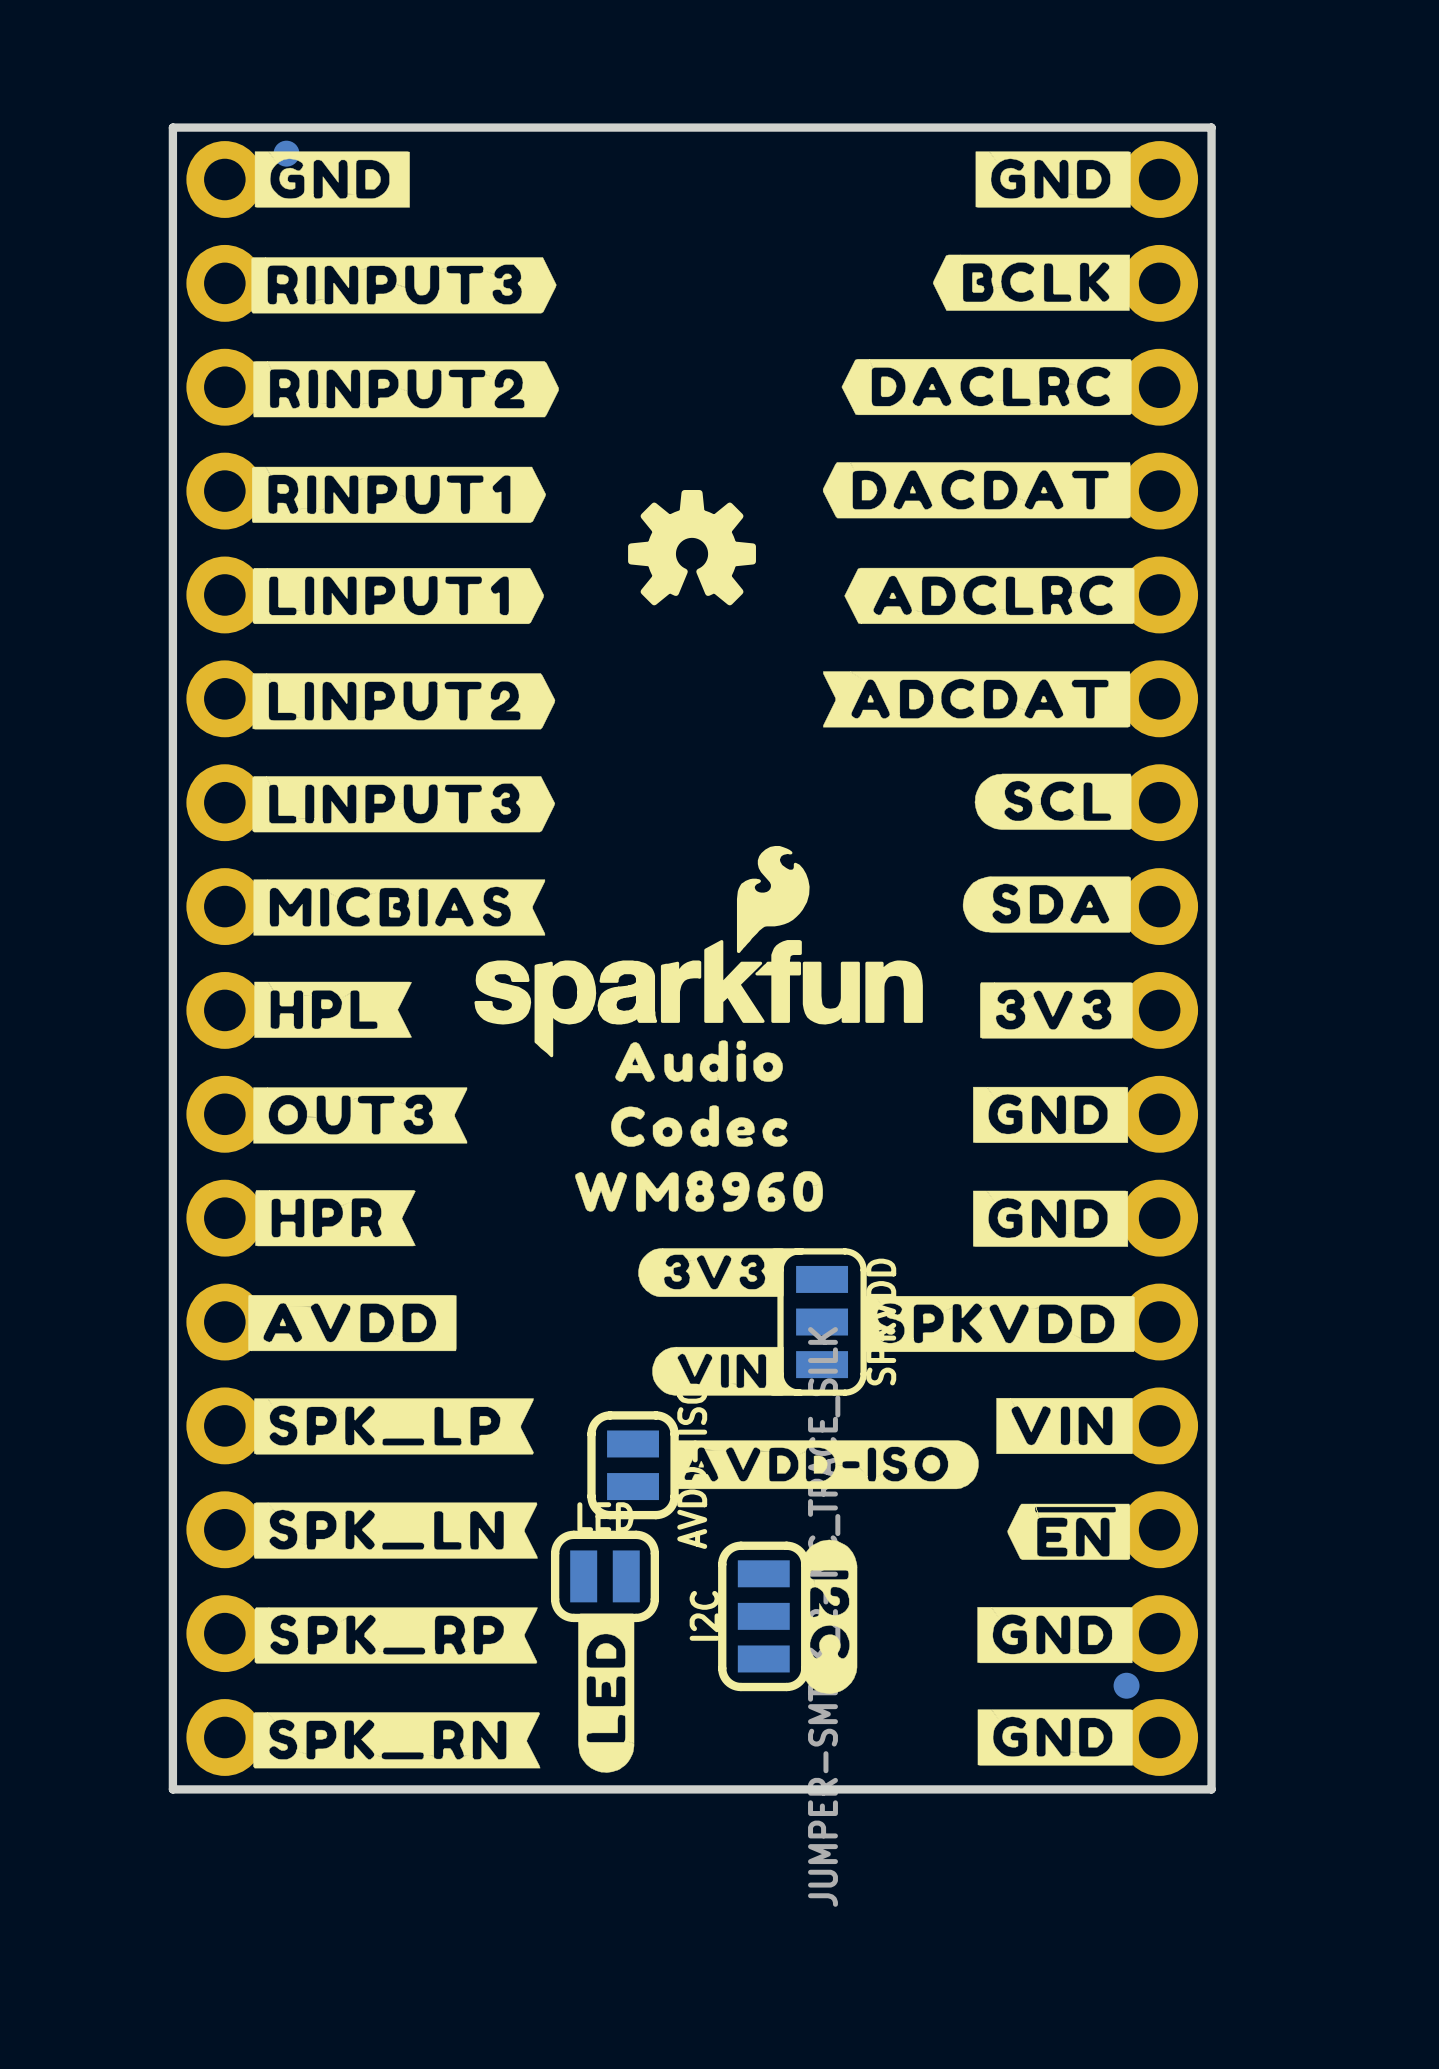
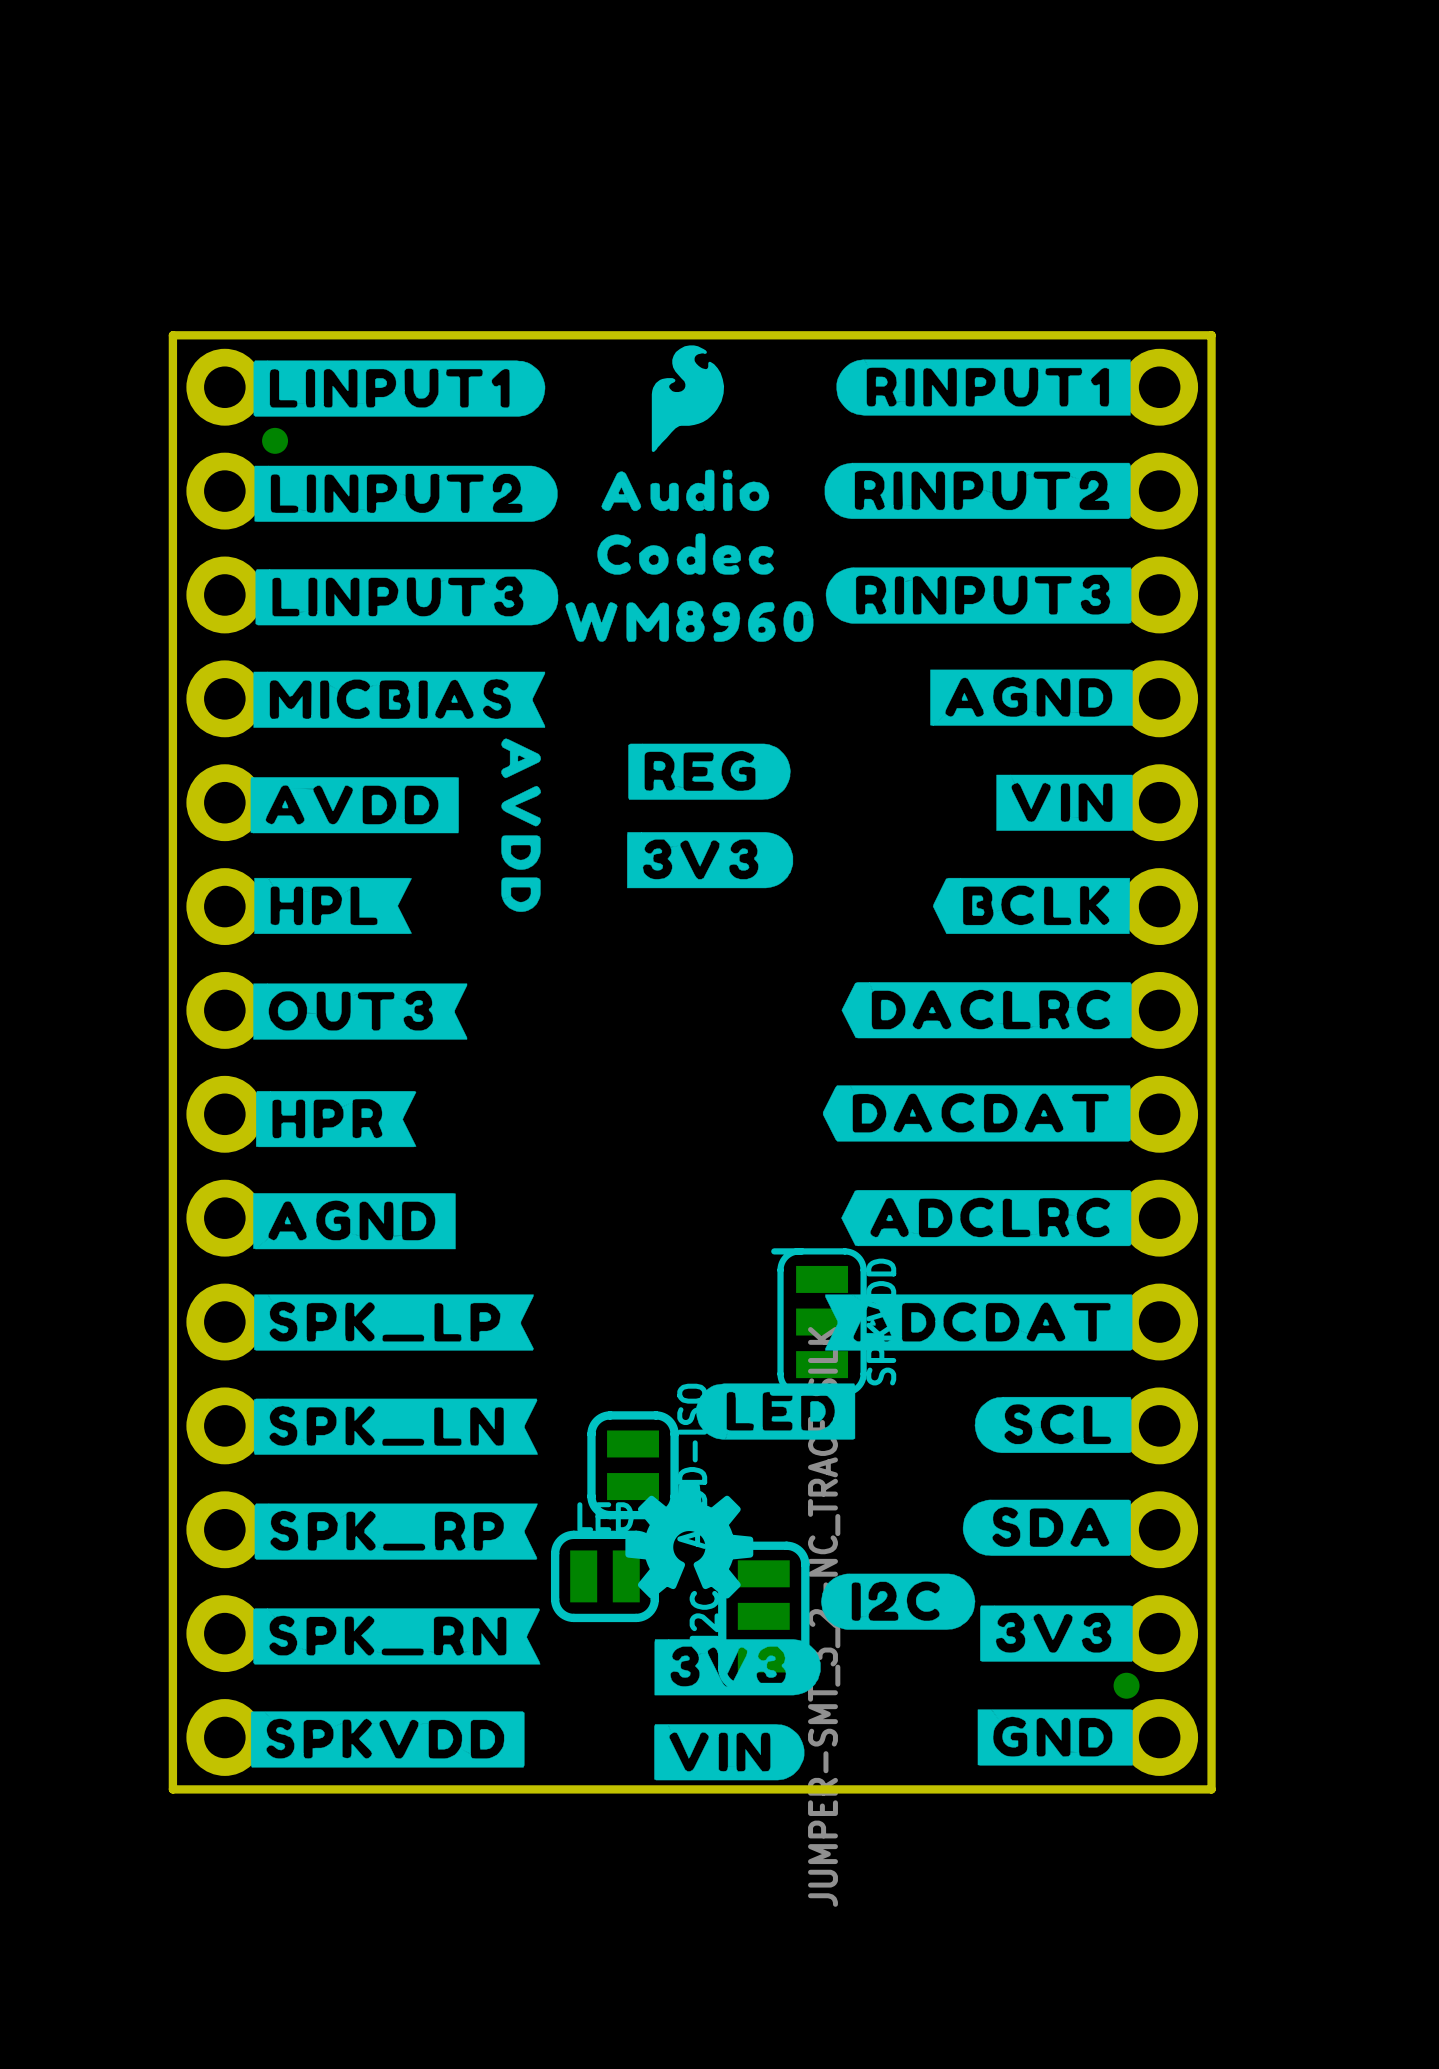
drawing: [254, 151, 410, 208] -> none
drawing: [975, 151, 1131, 208] -> none
part position: (286, 153) -> (275, 440)
drawing: [251, 257, 557, 314] -> none
drawing position: (1031, 282) -> (1031, 905)
board edge: (1211, 335) (1211, 127) (172, 127) (172, 335) -> (1211, 335) (172, 335)
drawing: none -> [651, 345, 725, 452]
drawing: none -> [824, 359, 1133, 726]
drawing shape: [253, 361, 559, 418] -> [253, 360, 546, 417]
drawing position: (986, 387) -> (986, 1010)
drawing shape: [252, 466, 547, 523] -> [254, 465, 558, 522]
drawing position: (976, 490) -> (976, 1113)
drawing position: (692, 547) -> (689, 1540)
drawing shape: [252, 567, 544, 625] -> [255, 569, 559, 626]
drawing position: (989, 595) -> (986, 1218)
drawing: [252, 673, 923, 1058] -> none
drawing position: (976, 699) -> (978, 1322)
drawing: none -> [501, 738, 541, 912]
drawing: none -> [627, 743, 794, 889]
drawing position: (1053, 801) -> (1053, 1424)
drawing position: (1046, 904) -> (1046, 1527)
drawing position: (399, 907) -> (399, 699)
part: (224, 958) -> none
part: (1159, 958) -> none
drawing position: (333, 1009) -> (333, 905)
drawing position: (1056, 1010) -> (1056, 1633)
drawing position: (699, 1061) -> (685, 490)
part: none -> (224, 1062)
part: none -> (1159, 1062)
drawing: [973, 1086, 1129, 1247] -> none
drawing position: (360, 1115) -> (360, 1011)
drawing position: (699, 1126) -> (685, 553)
drawing position: (699, 1191) -> (689, 621)
drawing: none -> [253, 1193, 456, 1250]
drawing position: (335, 1218) -> (336, 1119)
drawing: [638, 1248, 784, 1297] -> none
drawing position: (352, 1323) -> (354, 805)
drawing position: (997, 1324) -> (387, 1739)
drawing: [652, 1346, 1133, 1664] -> none
drawing: none -> [696, 1383, 856, 1440]
drawing position: (1064, 1425) -> (1064, 802)
drawing position: (393, 1426) -> (393, 1322)
drawing position: (395, 1530) -> (395, 1426)
drawing: [801, 1539, 858, 1694] -> none
drawing: none -> [654, 1573, 976, 1781]
drawing: [578, 1613, 635, 1773] -> none
drawing position: (396, 1635) -> (396, 1531)
drawing position: (396, 1740) -> (396, 1636)

